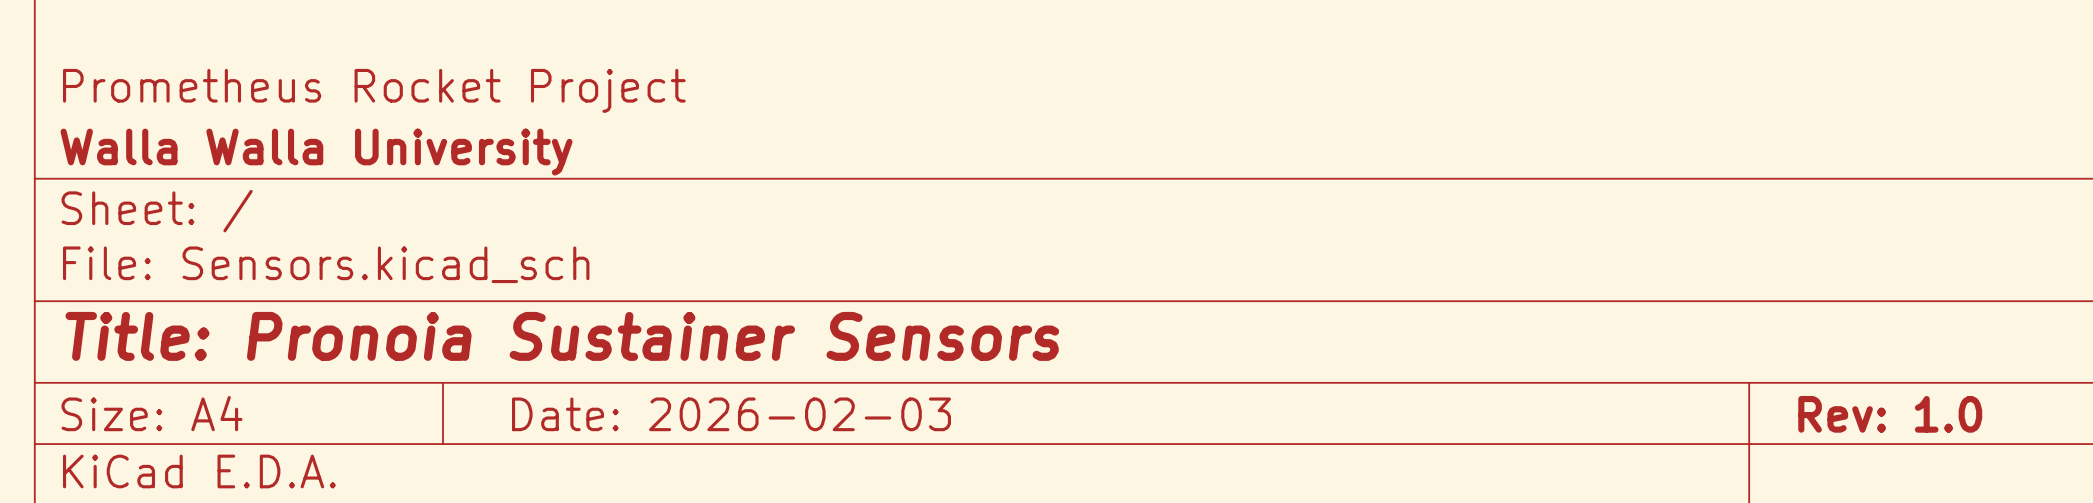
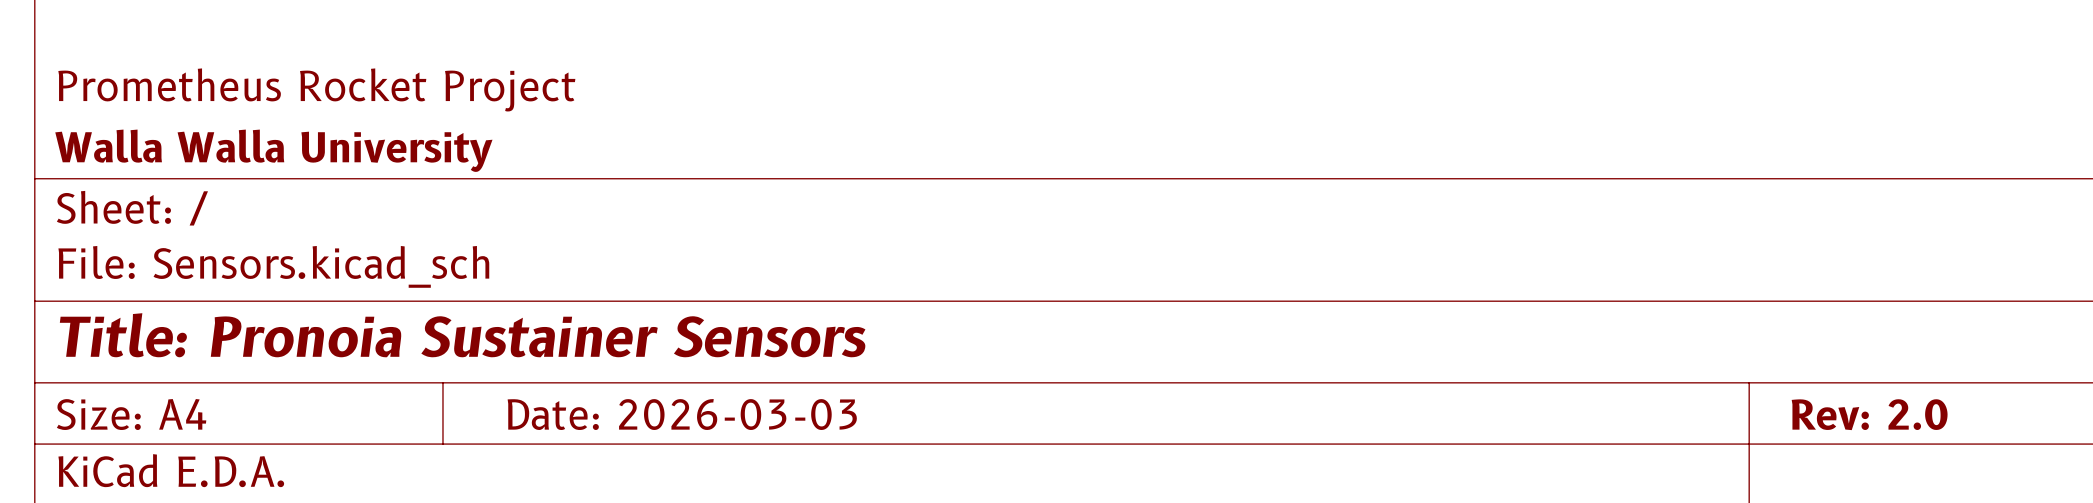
title block: Date: 2026-02-03 (731, 414) -> Date: 2026-03-03 (682, 414)
title block: Rev: 1.0 (1890, 414) -> Rev: 2.0 (1869, 414)

